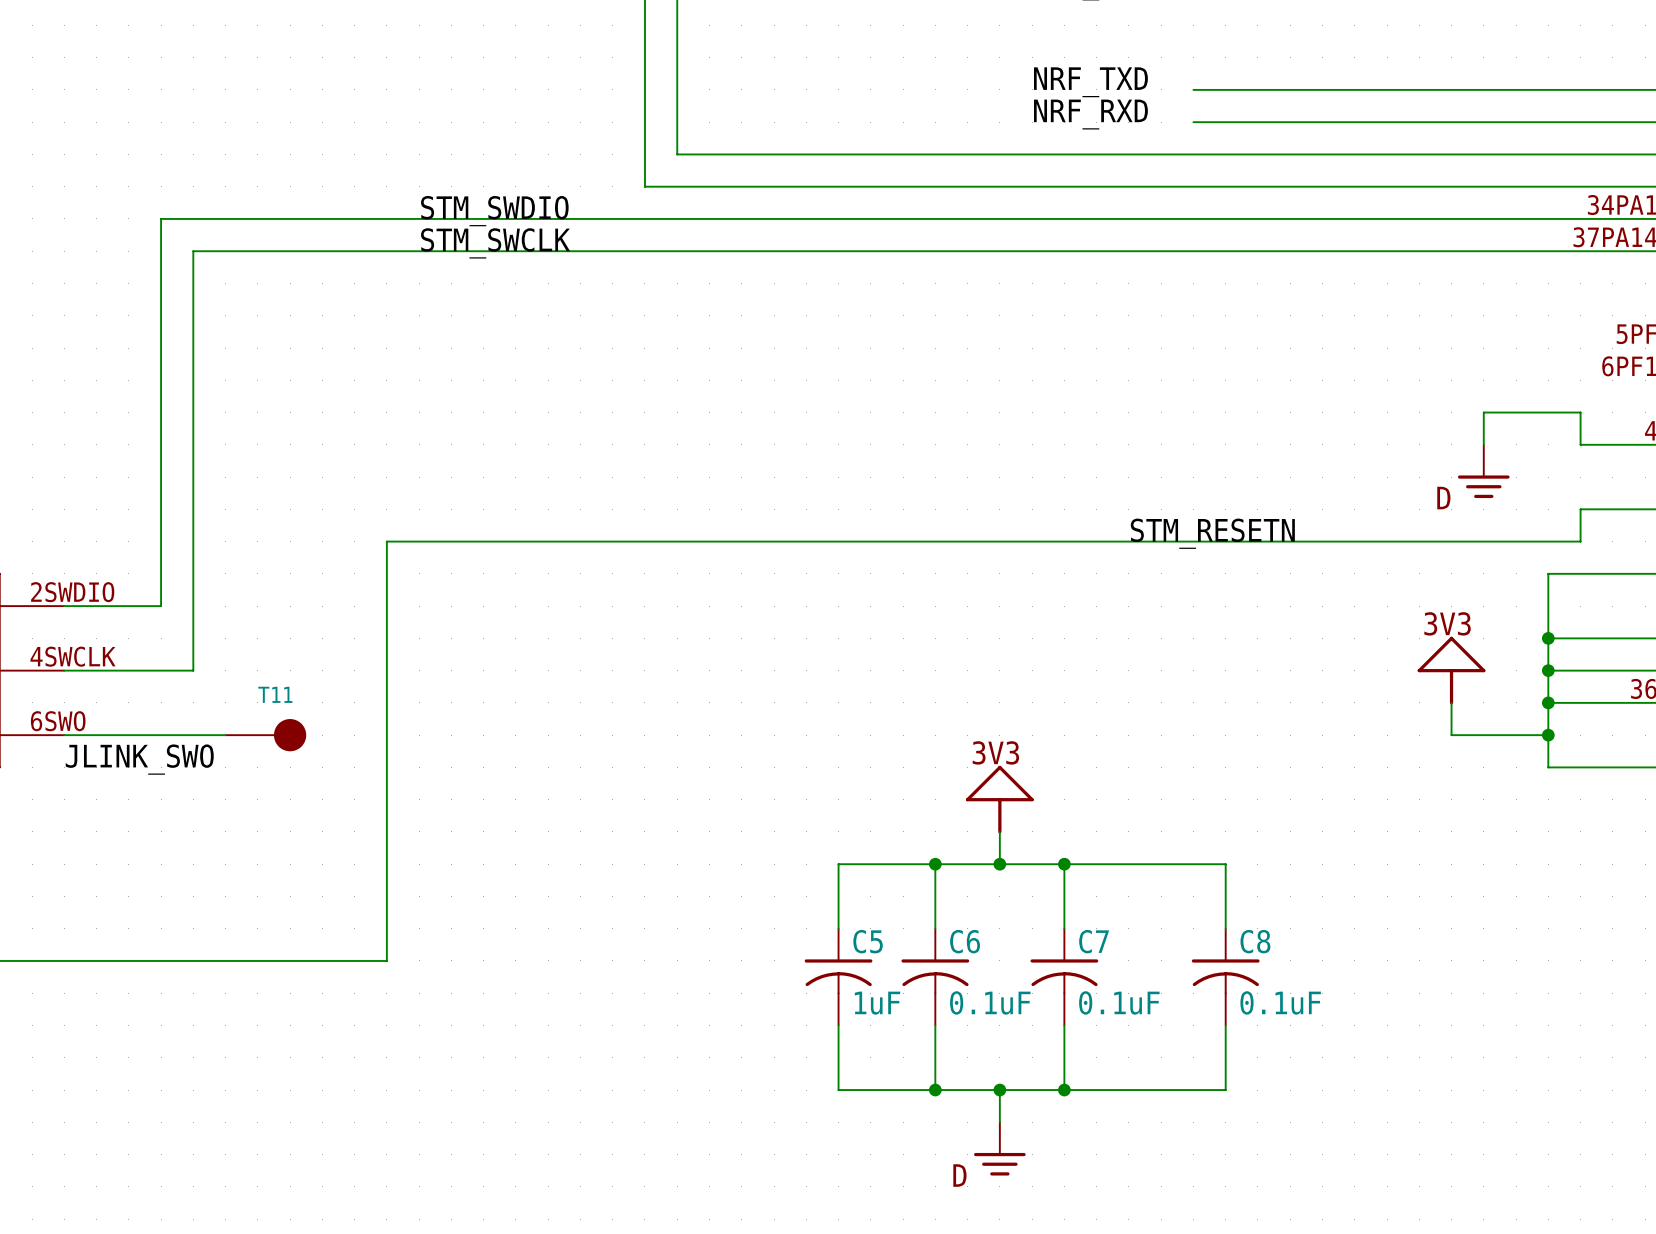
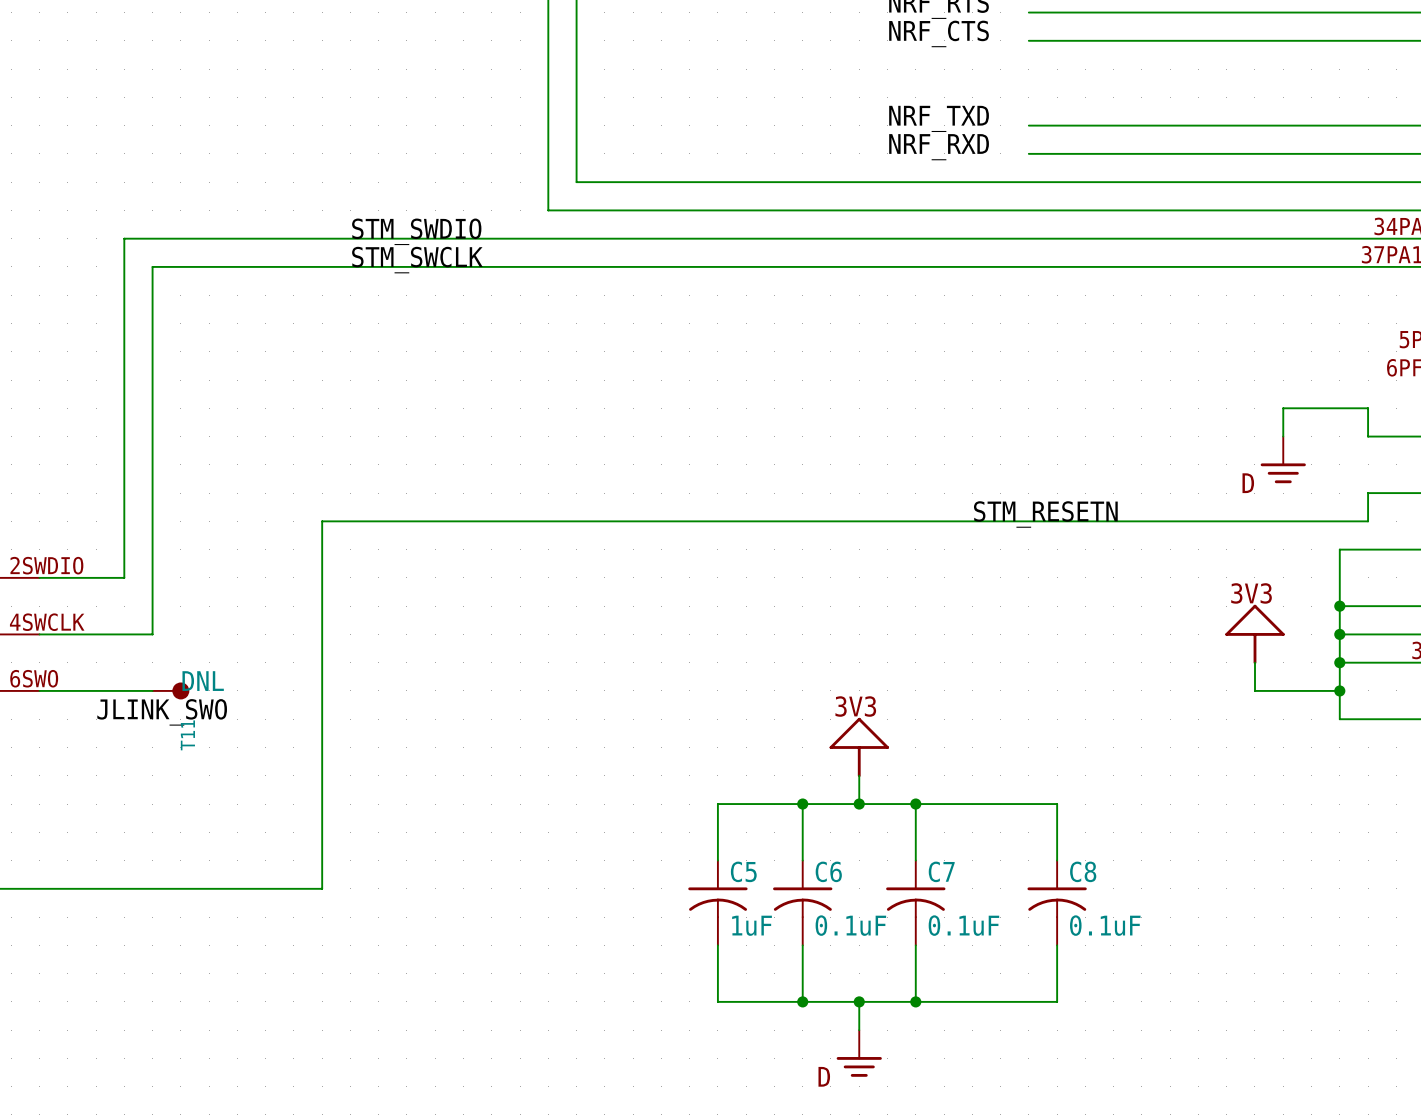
T11 name position: T11 (275, 694) -> T11 (187, 735)
T11 symbol: [225, 719, 307, 752] -> [152, 682, 190, 700]
T11 text: none -> DNL (203, 681)
label position: JLINK_SWO (139, 759) -> JLINK_SWO (162, 712)

